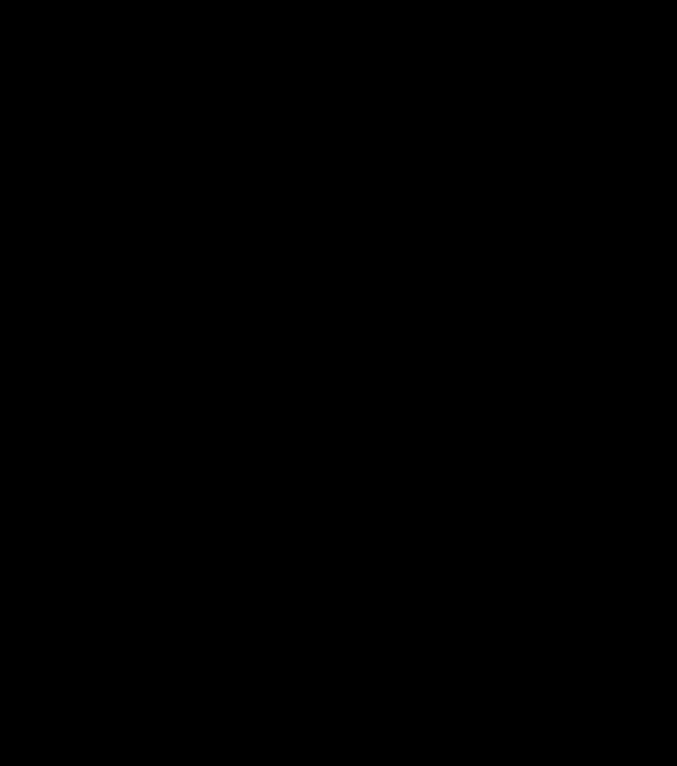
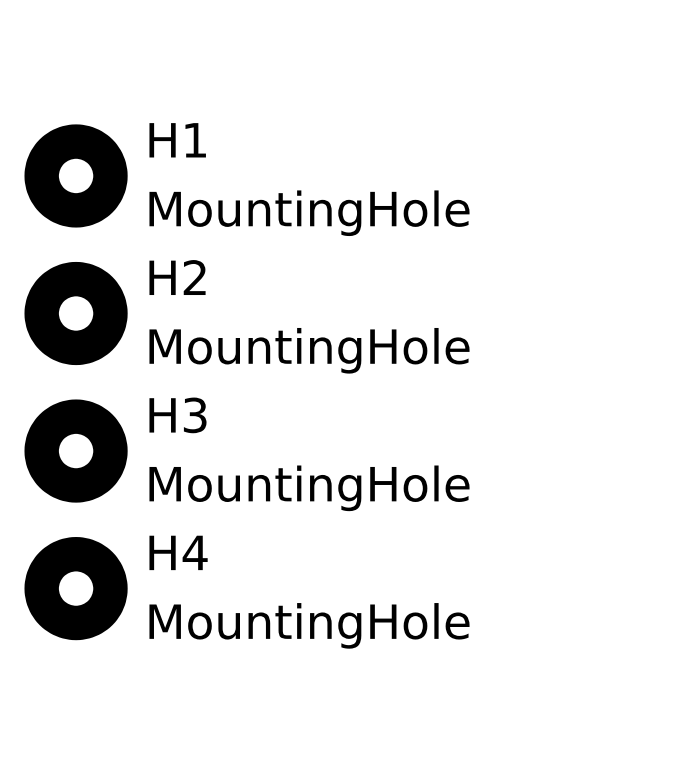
H1: none -> MountingHole (76, 175)
H2: none -> MountingHole (76, 313)
H3: none -> MountingHole (76, 451)
H4: none -> MountingHole (76, 588)

